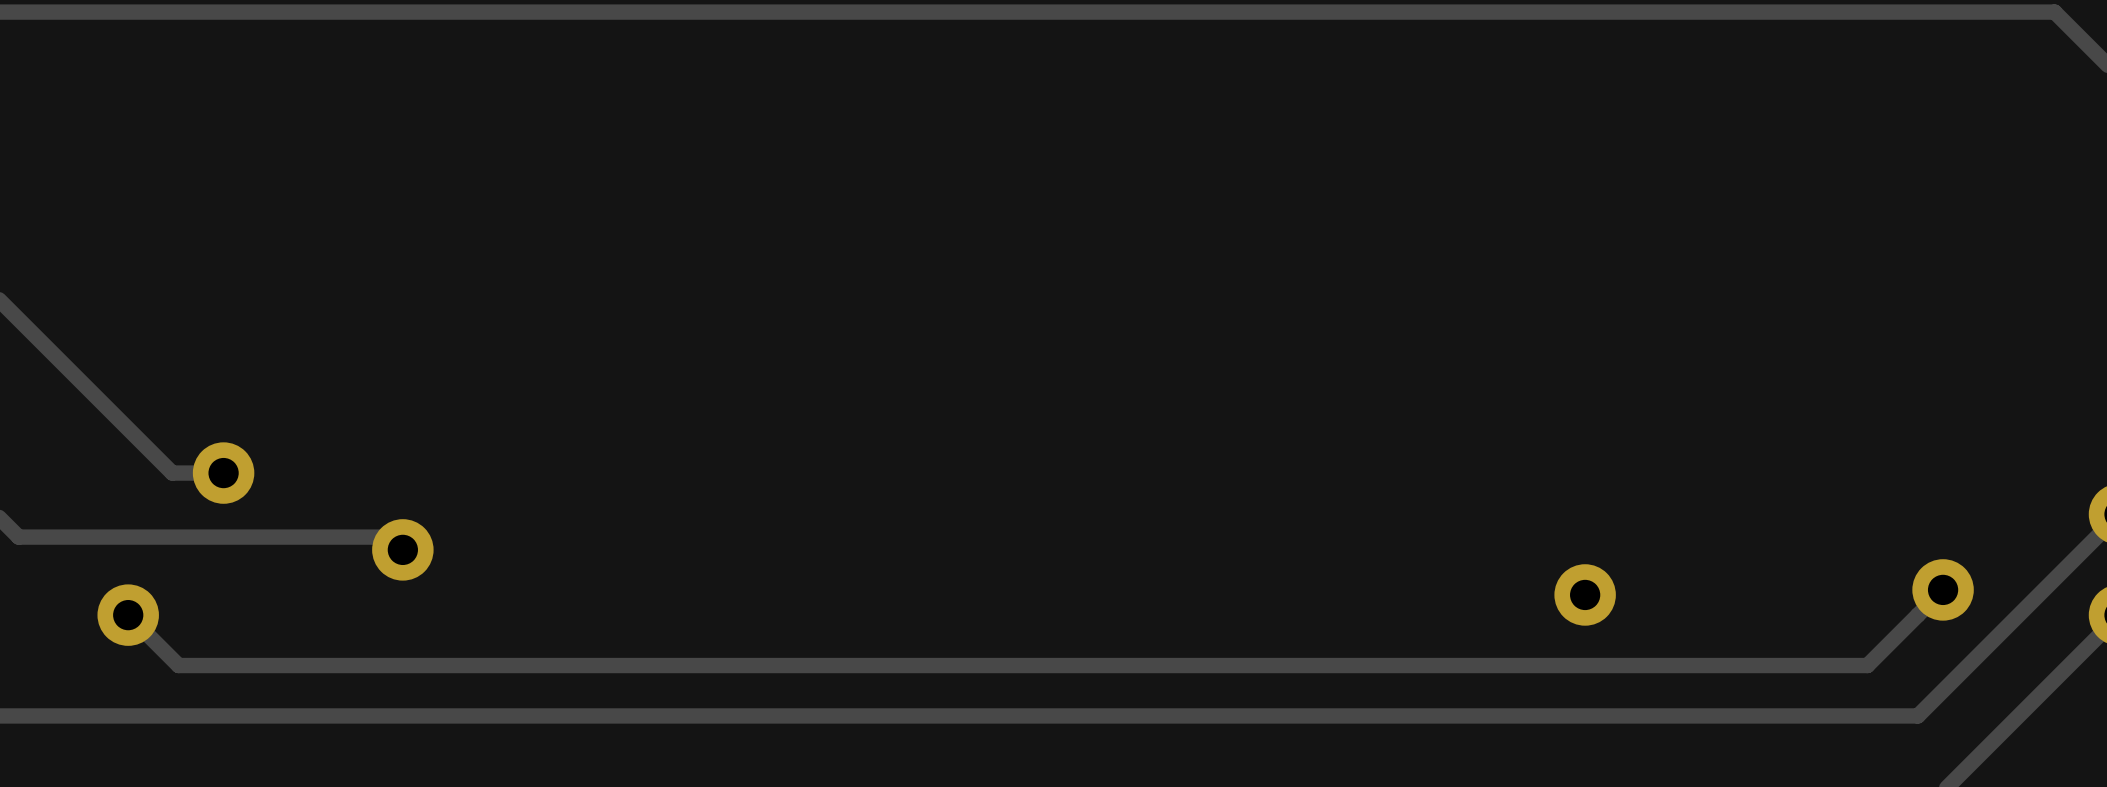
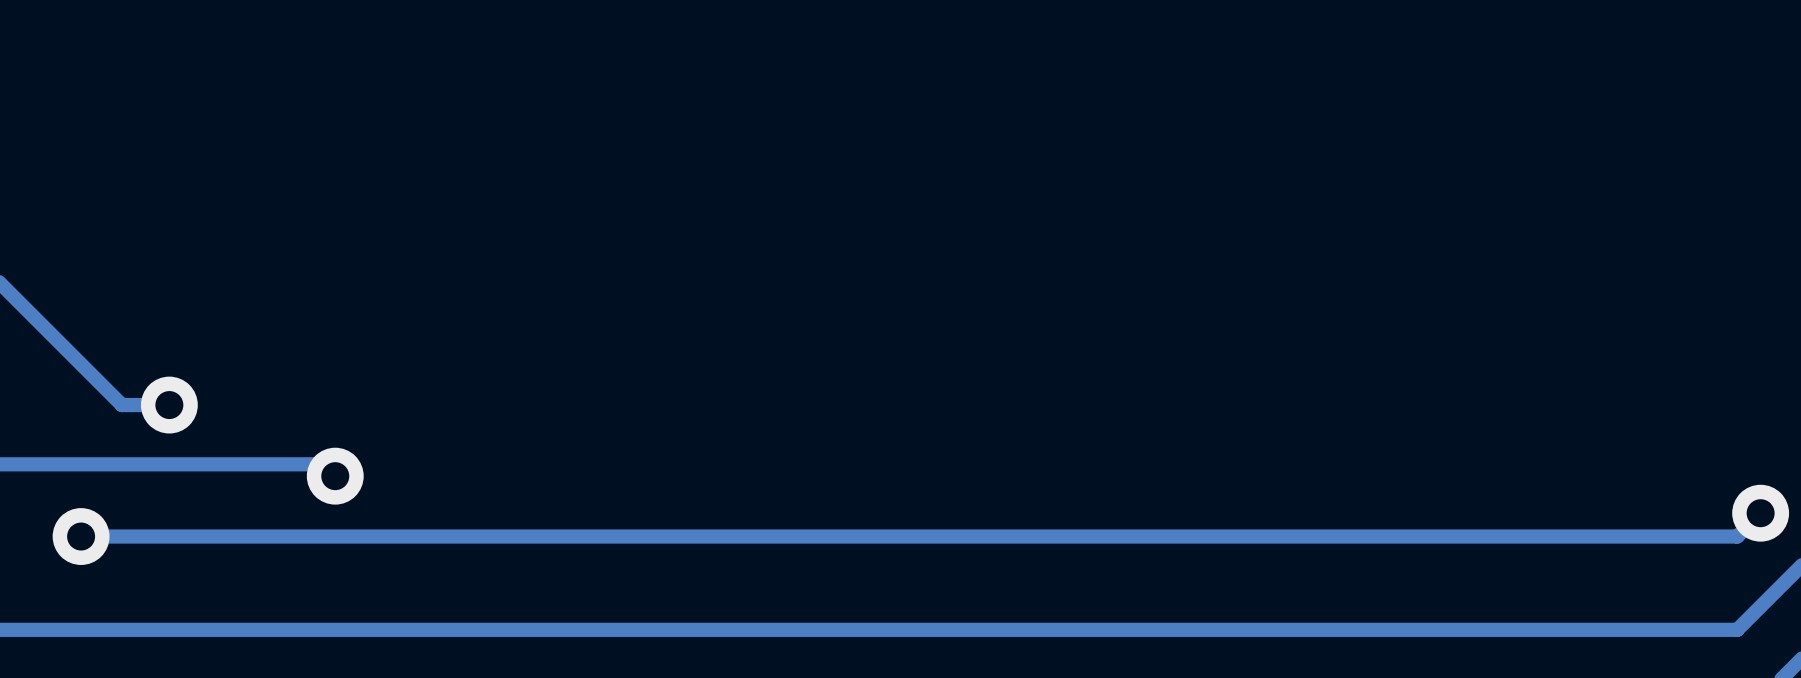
via: (1585, 594) -> none
track: (1917, 615) (1867, 665) (178, 665) (128, 615) -> (1737, 536) (81, 536)

